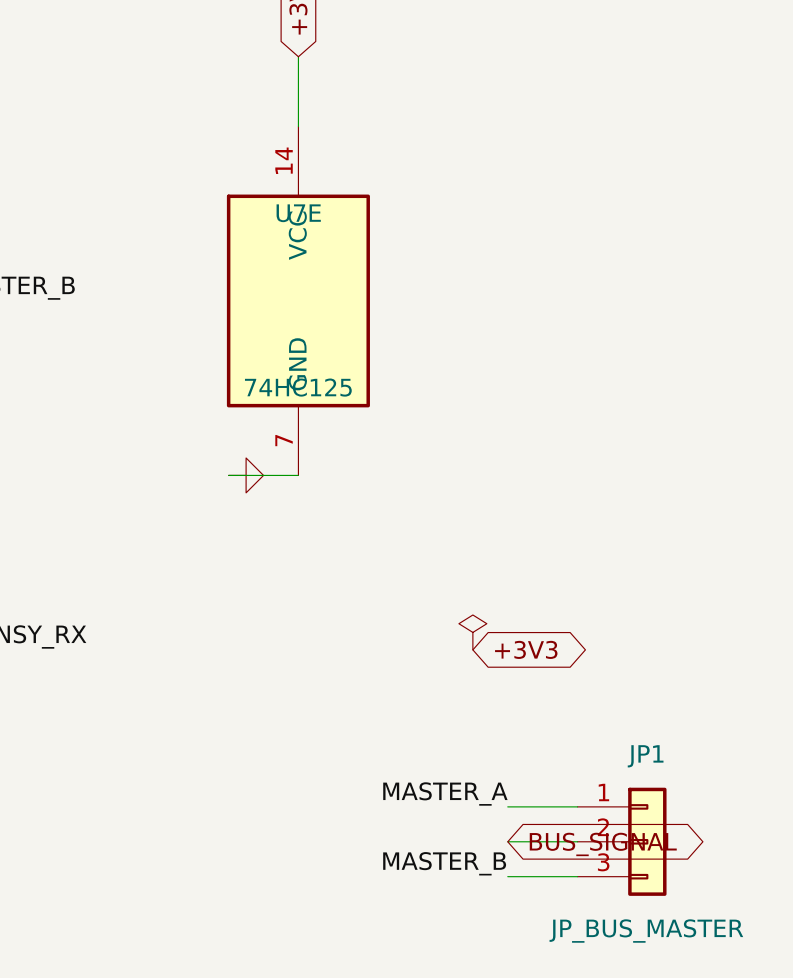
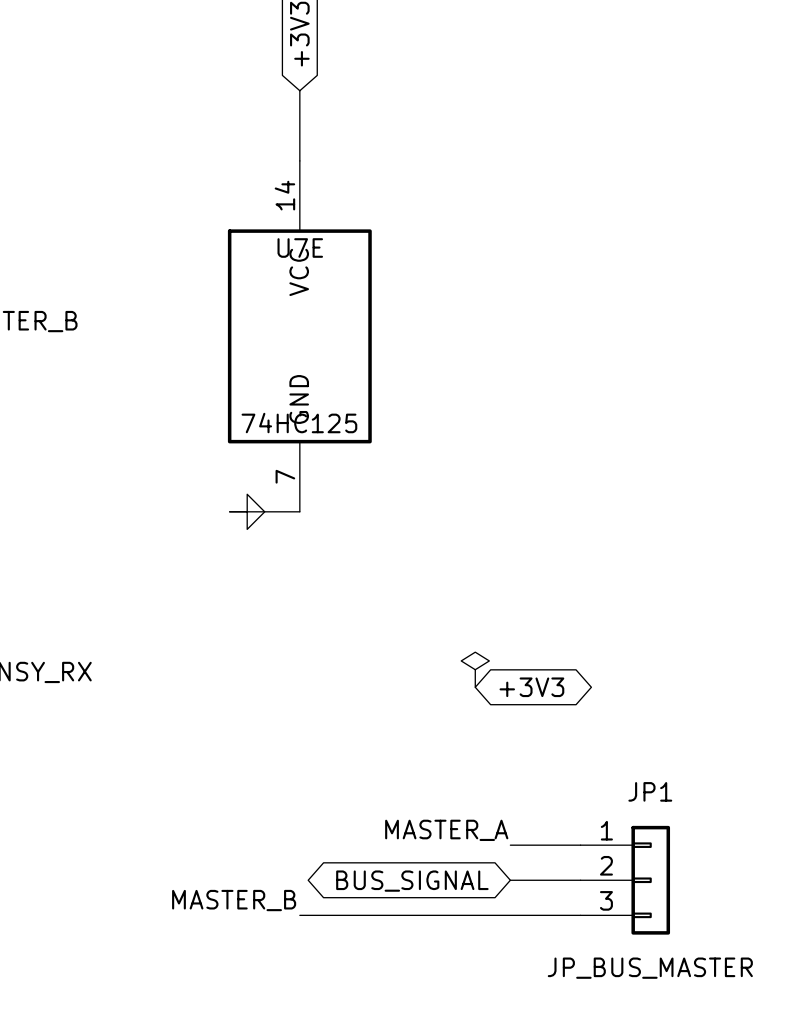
global label rotation: 0° (603, 844) -> 180° (412, 881)
global label position: BUS_SIGNAL (603, 844) -> BUS_SIGNAL (412, 881)
label position: MASTER_B (444, 863) -> MASTER_B (234, 900)
wire: none -> (299, 915) (510, 915)

